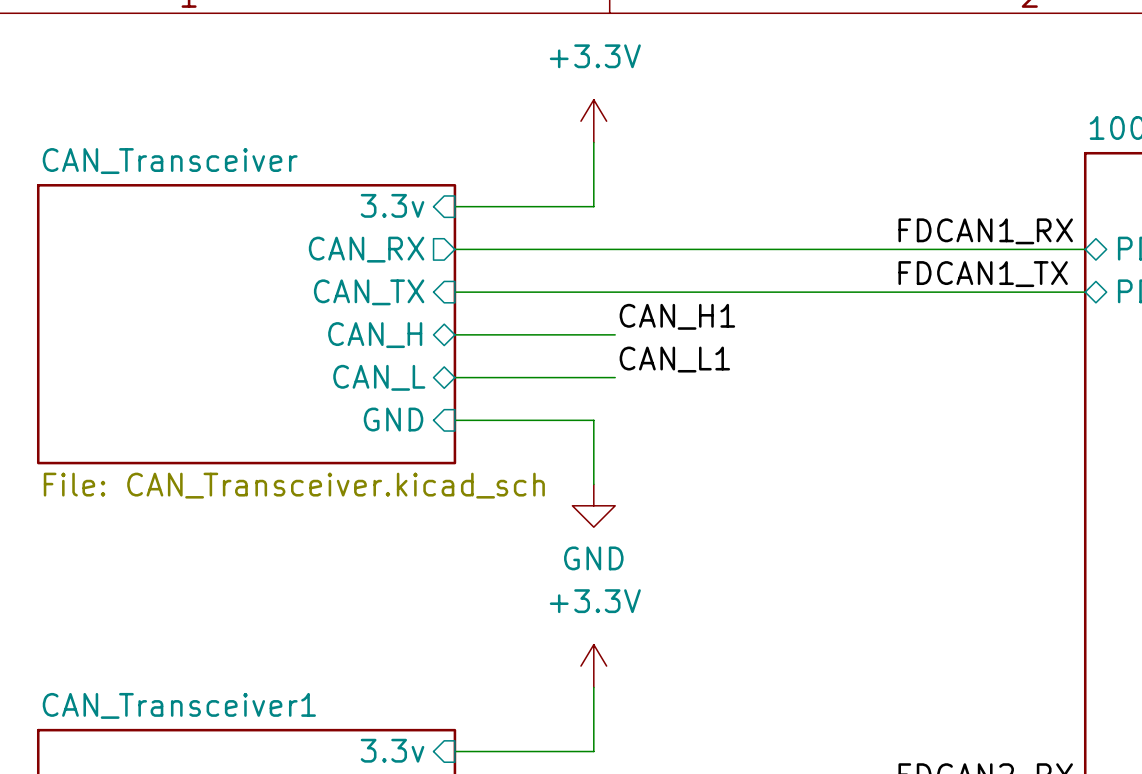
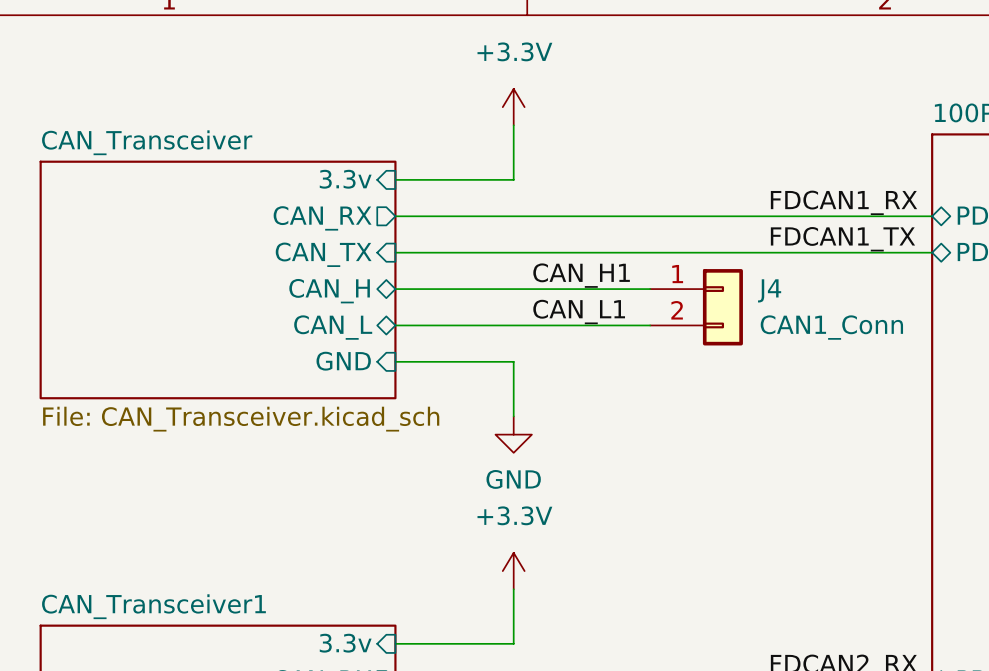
wire: none -> (531, 289) (650, 289)
J4: none -> CAN1_Conn (696, 307)
wire: none -> (531, 325) (650, 325)

